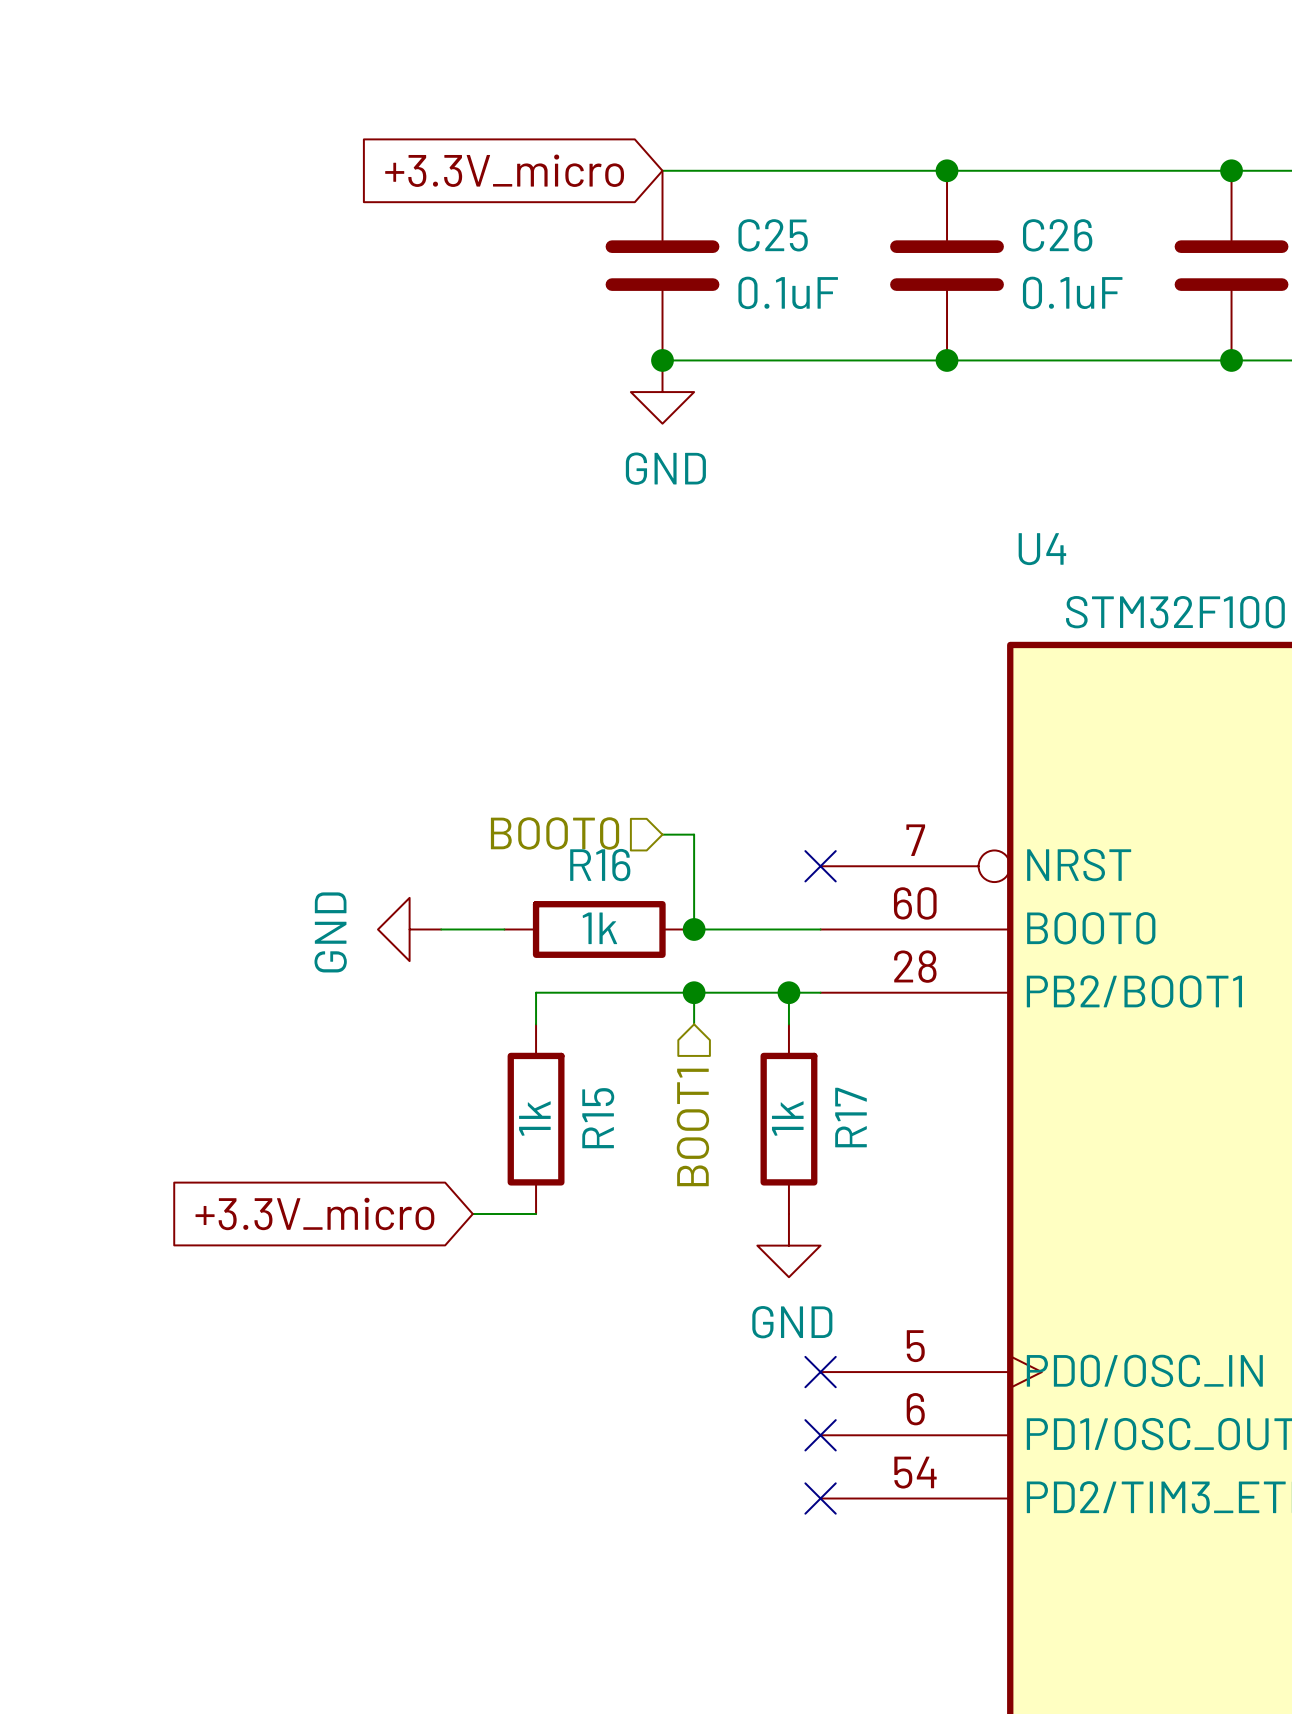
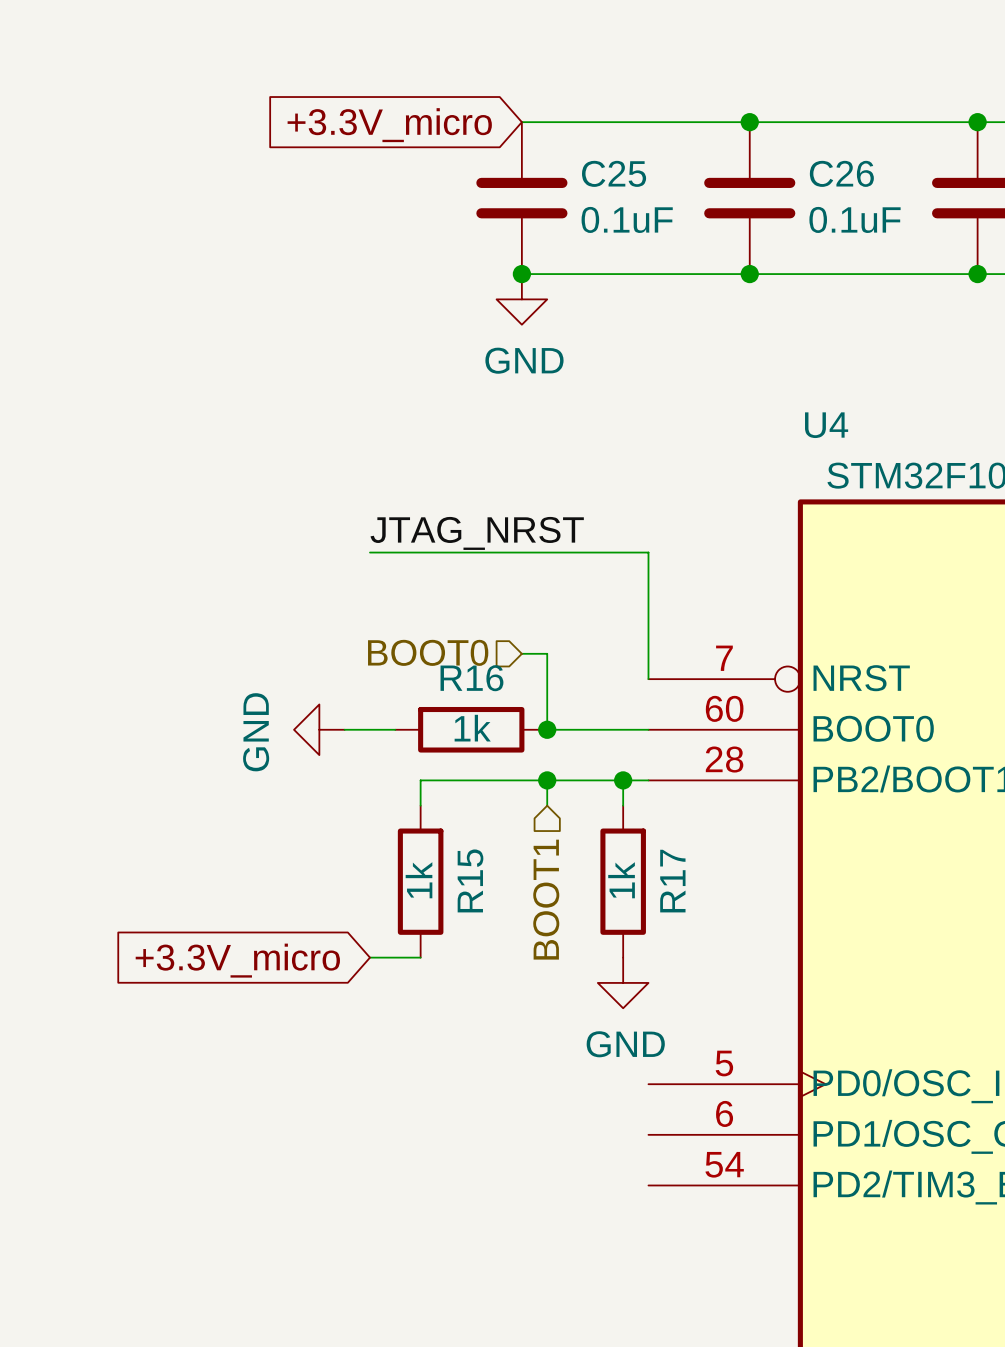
label: none -> JTAG_NRST (477, 533)
wire: none -> (369, 552) (648, 552) (648, 679)
no-connect mark: (820, 866) -> none
no-connect mark: (820, 1372) -> none
no-connect mark: (820, 1435) -> none
no-connect mark: (820, 1498) -> none

